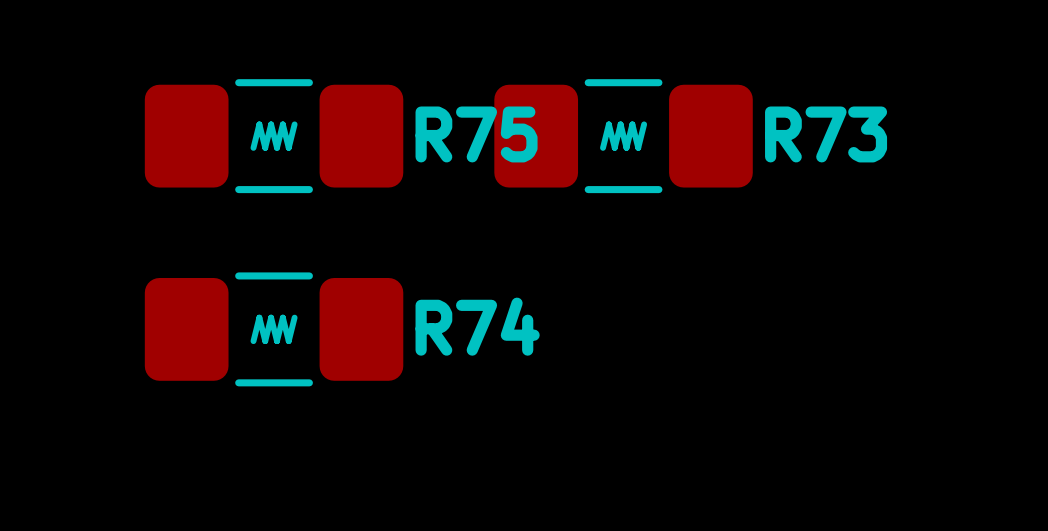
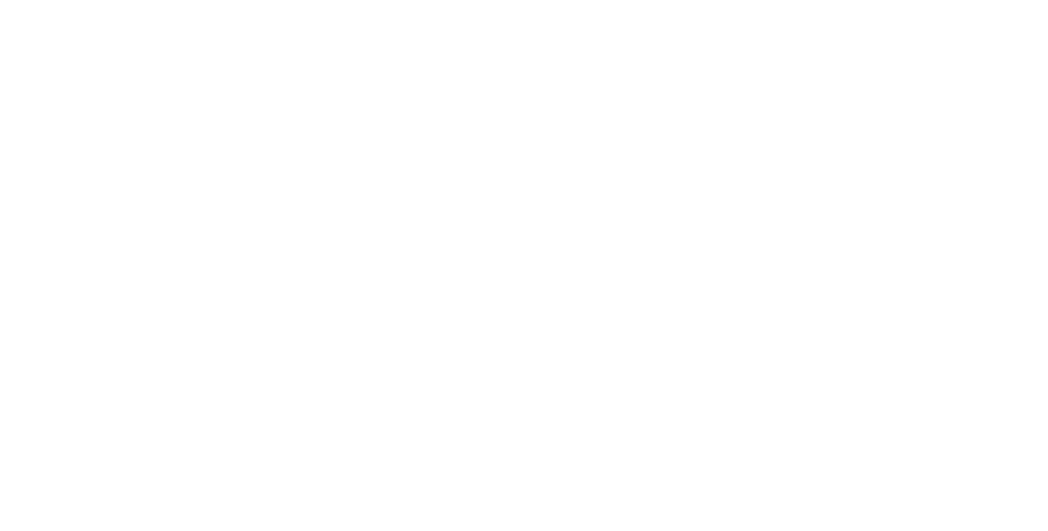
R75: (274, 136) -> none
R73: (623, 136) -> none
R74: (274, 329) -> none

